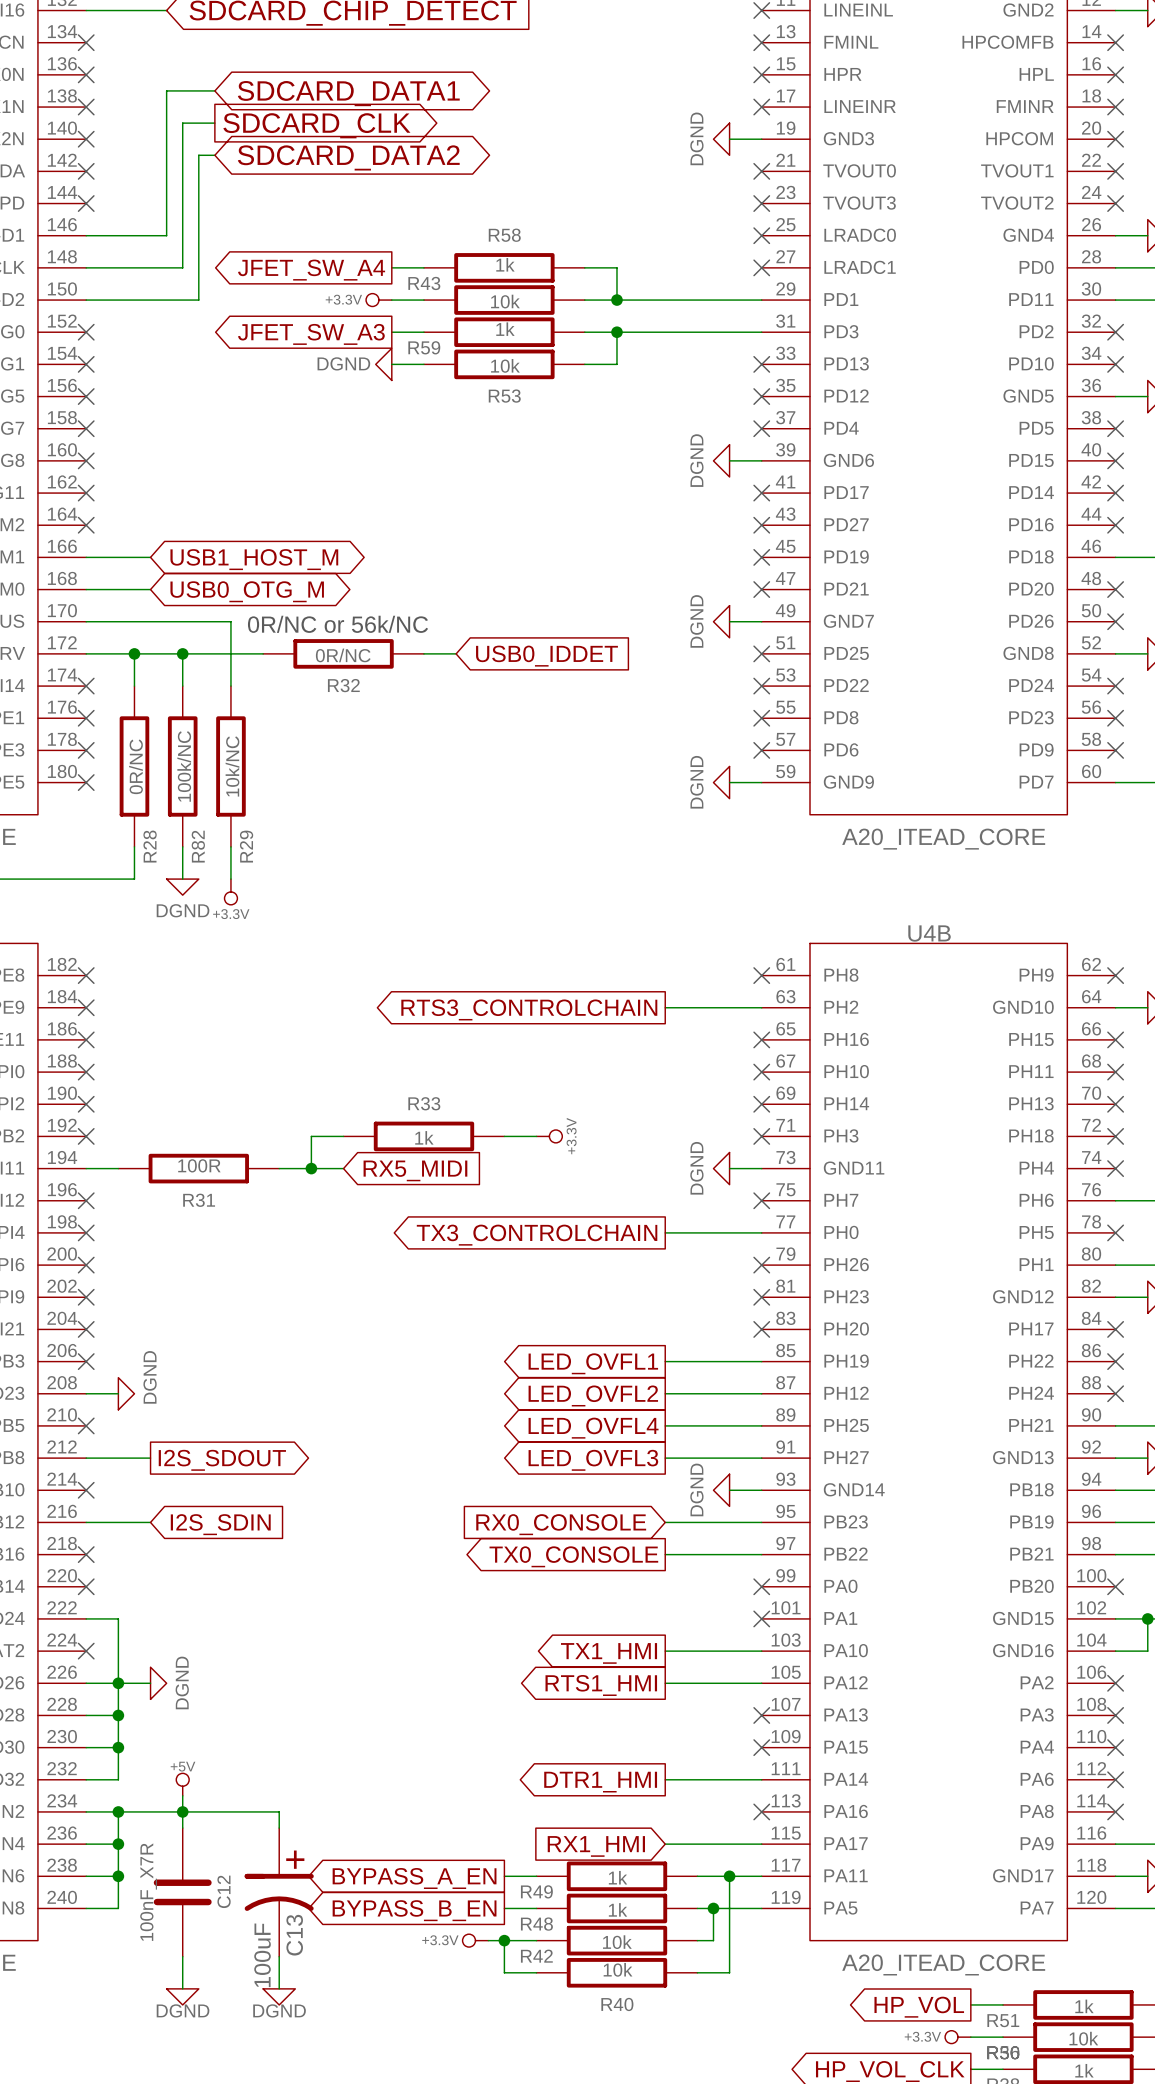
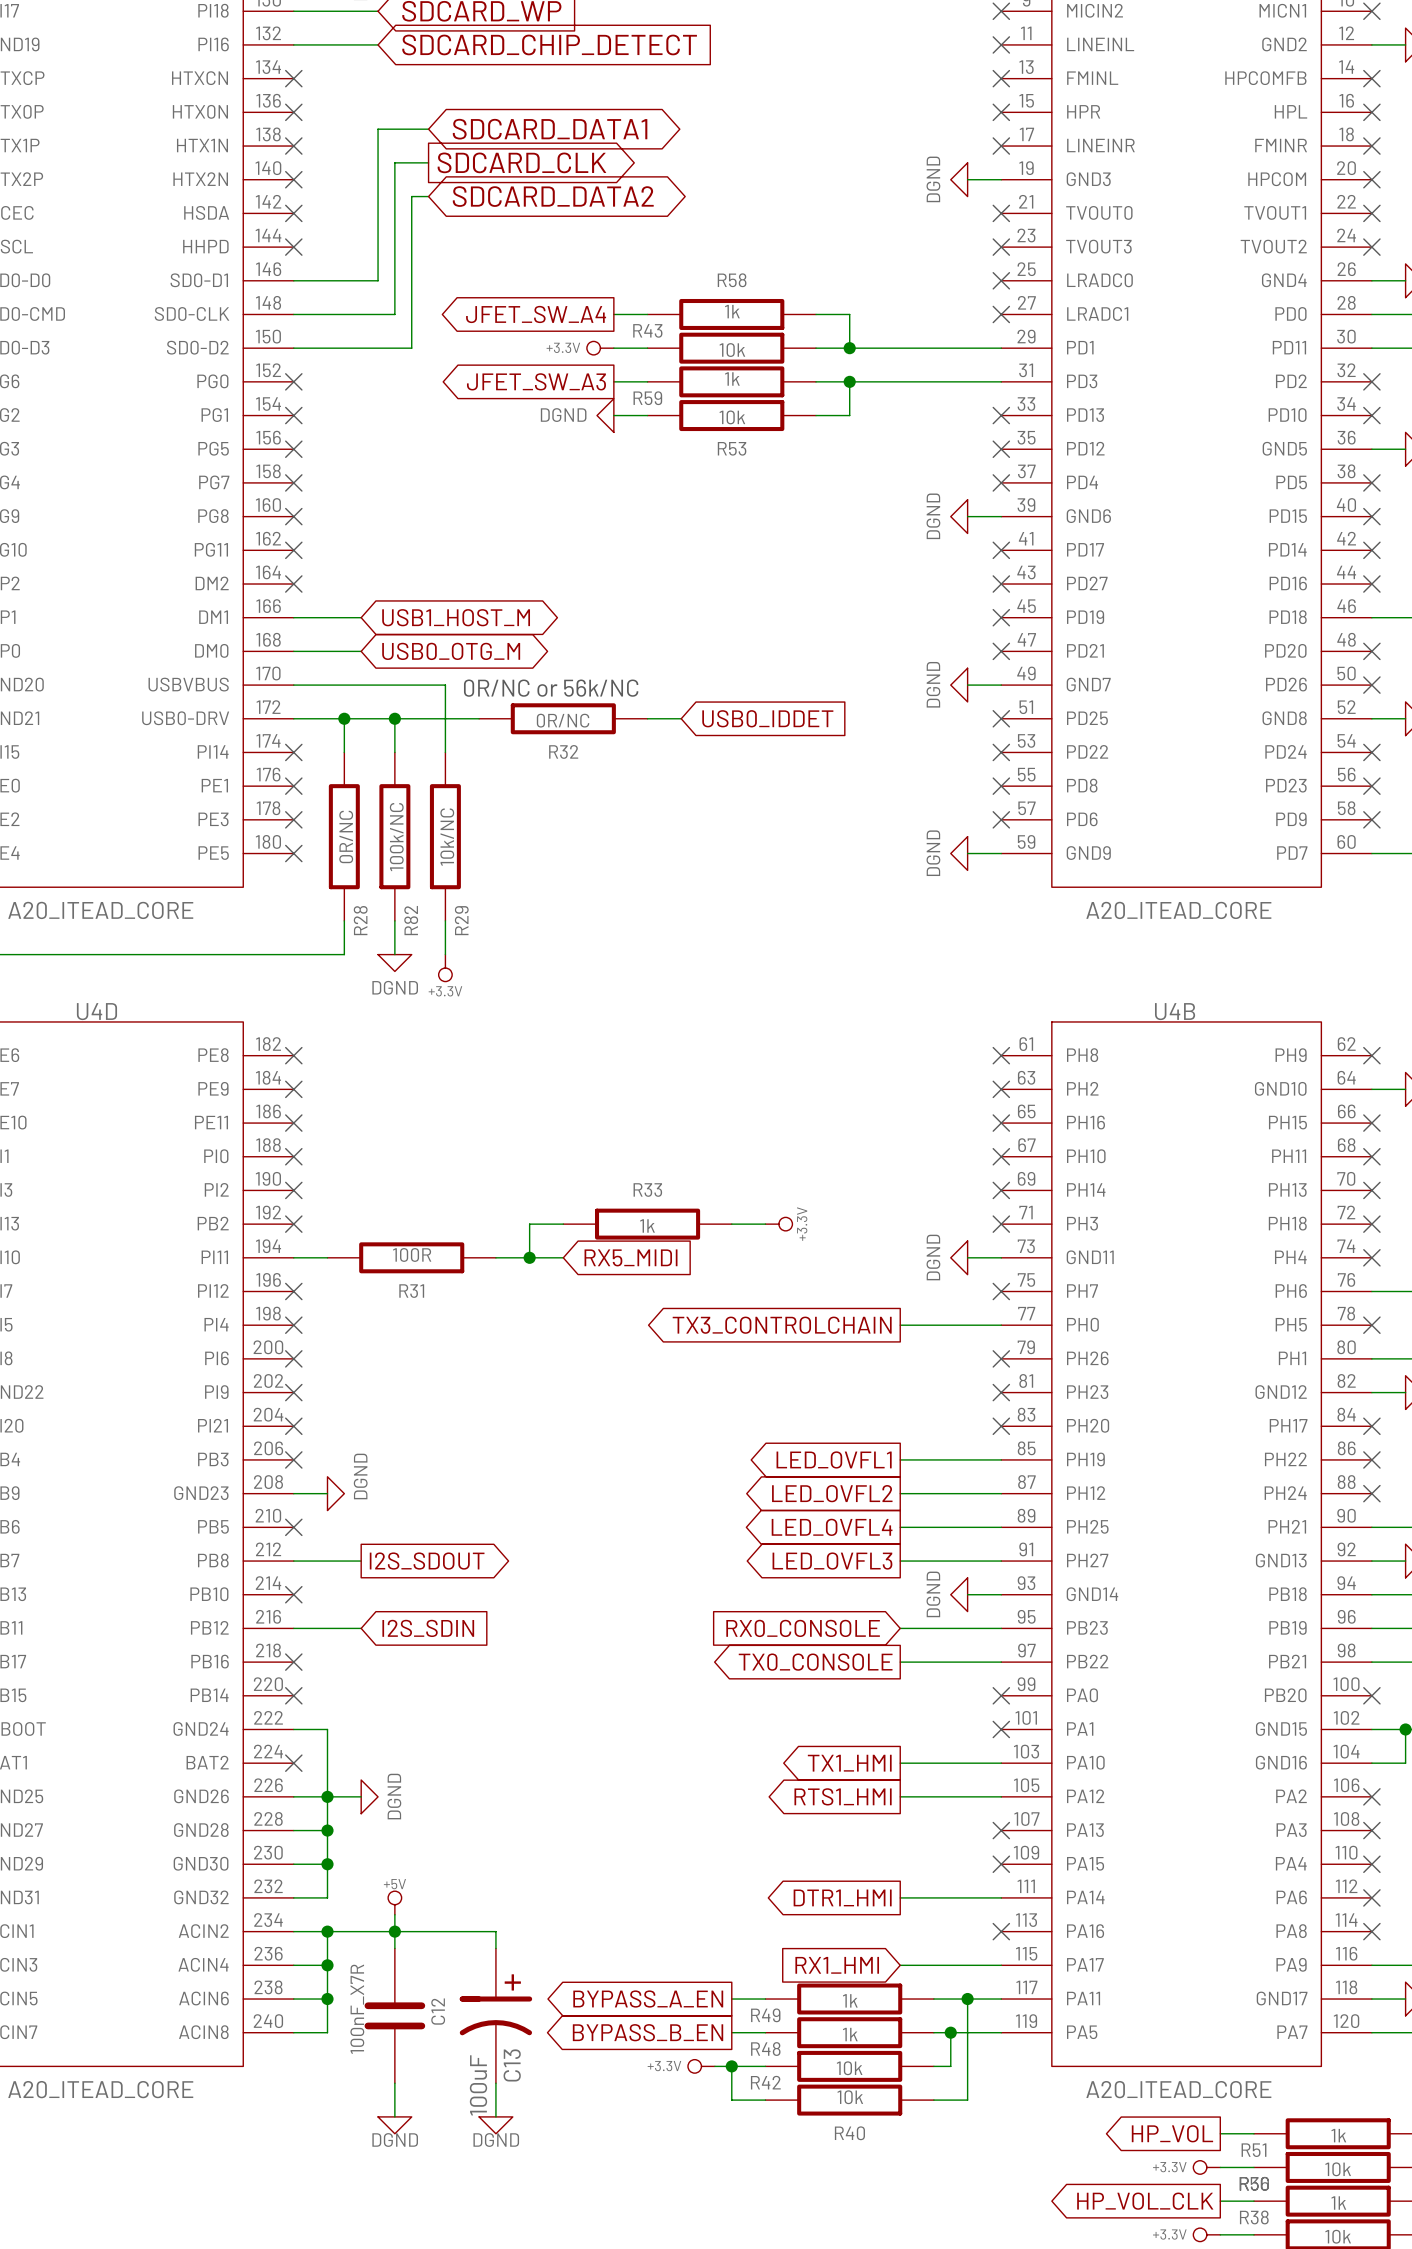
wire: (665, 1007) (761, 1007) -> none
no-connect mark: none -> (1001, 1089)
global label: RTS3_CONTROLCHAIN (529, 1009) -> none

